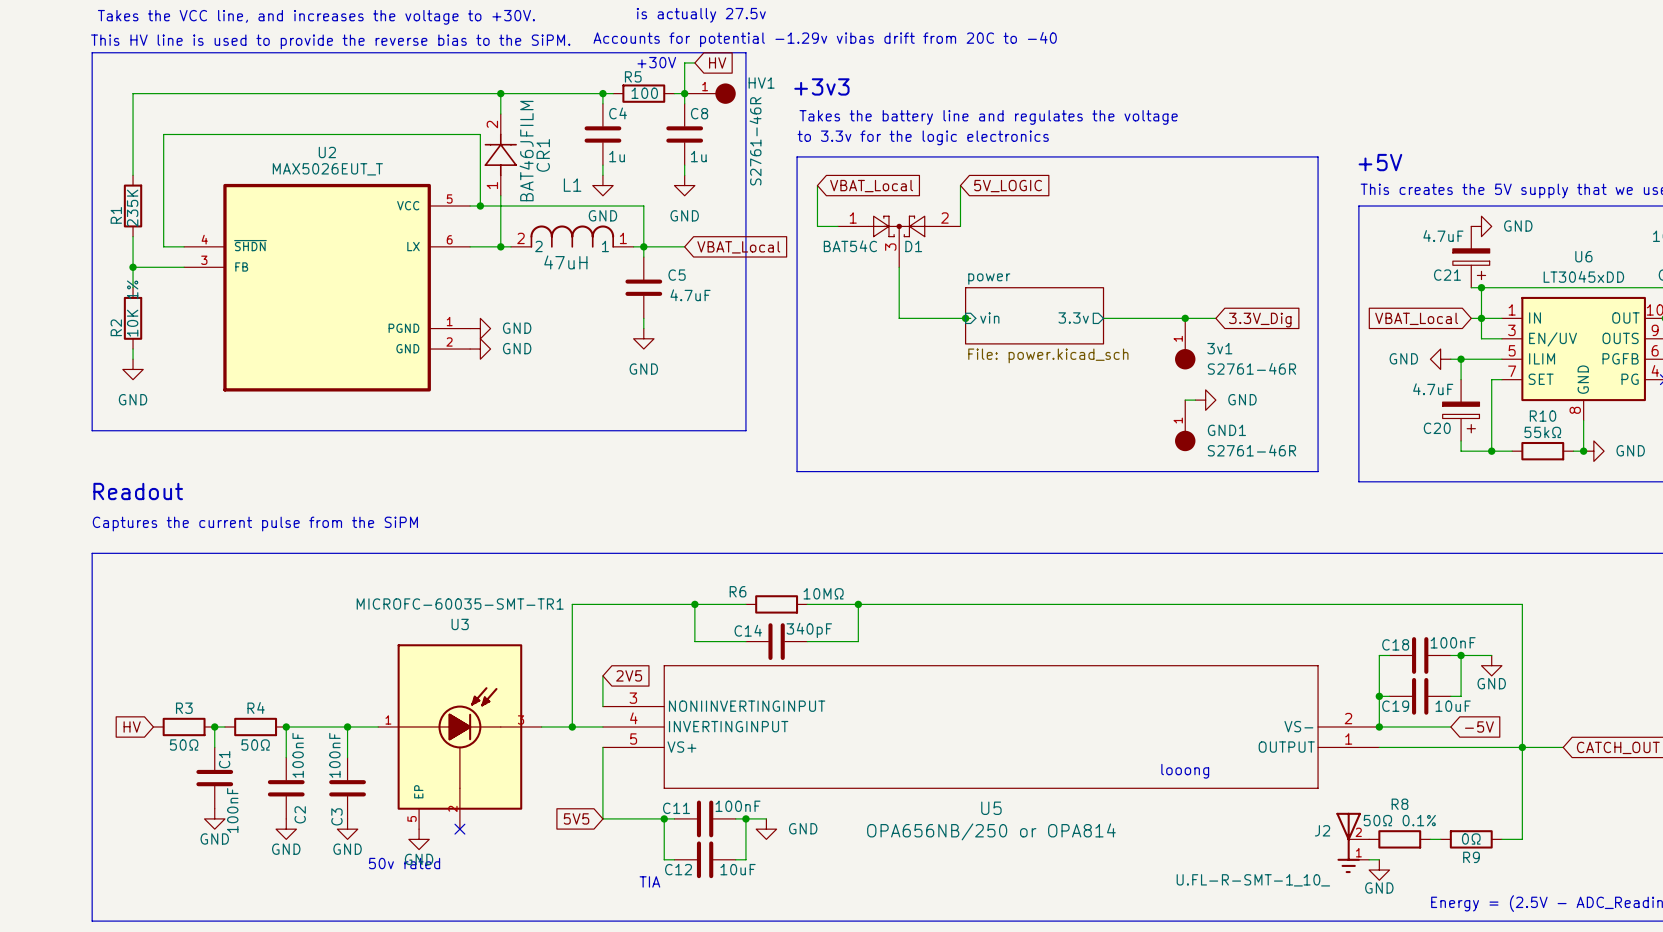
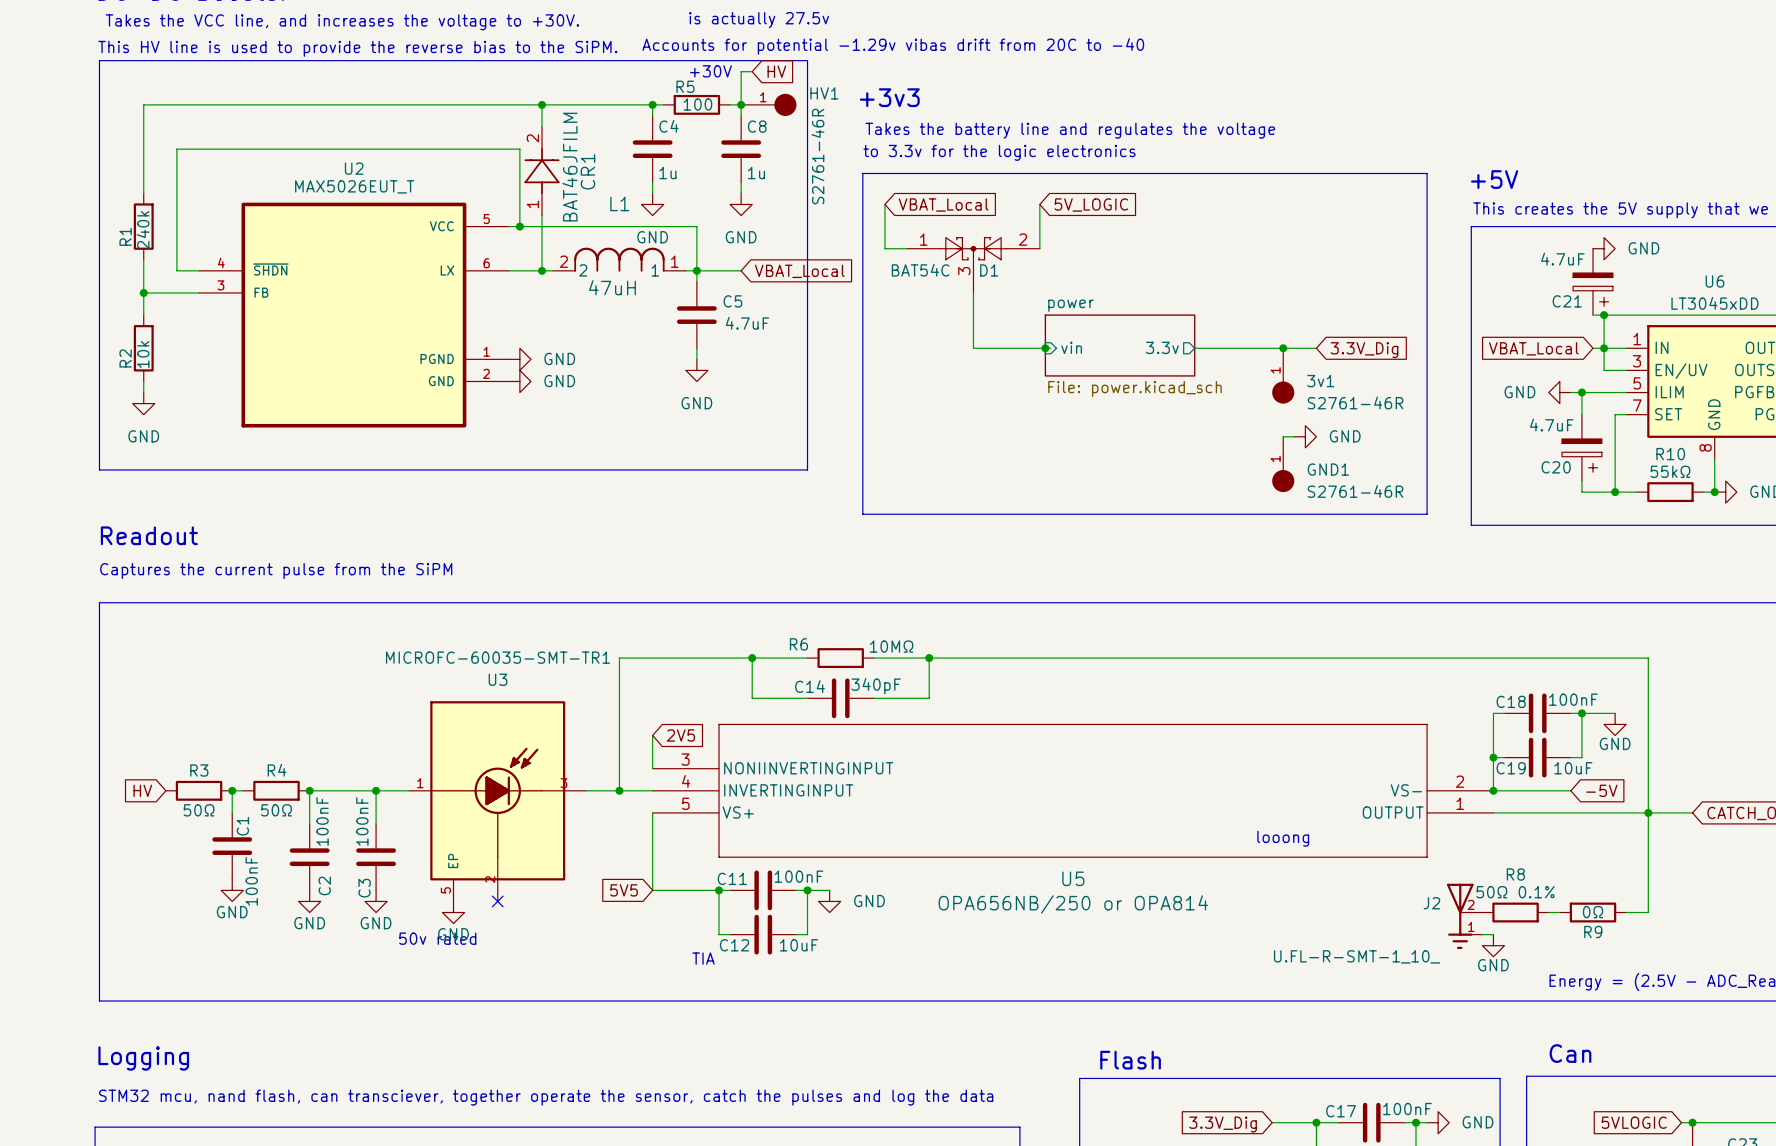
R1 value: 235K (132, 208) -> 240k (143, 230)
R2 value: 10K 1% (132, 308) -> 10k (143, 354)

